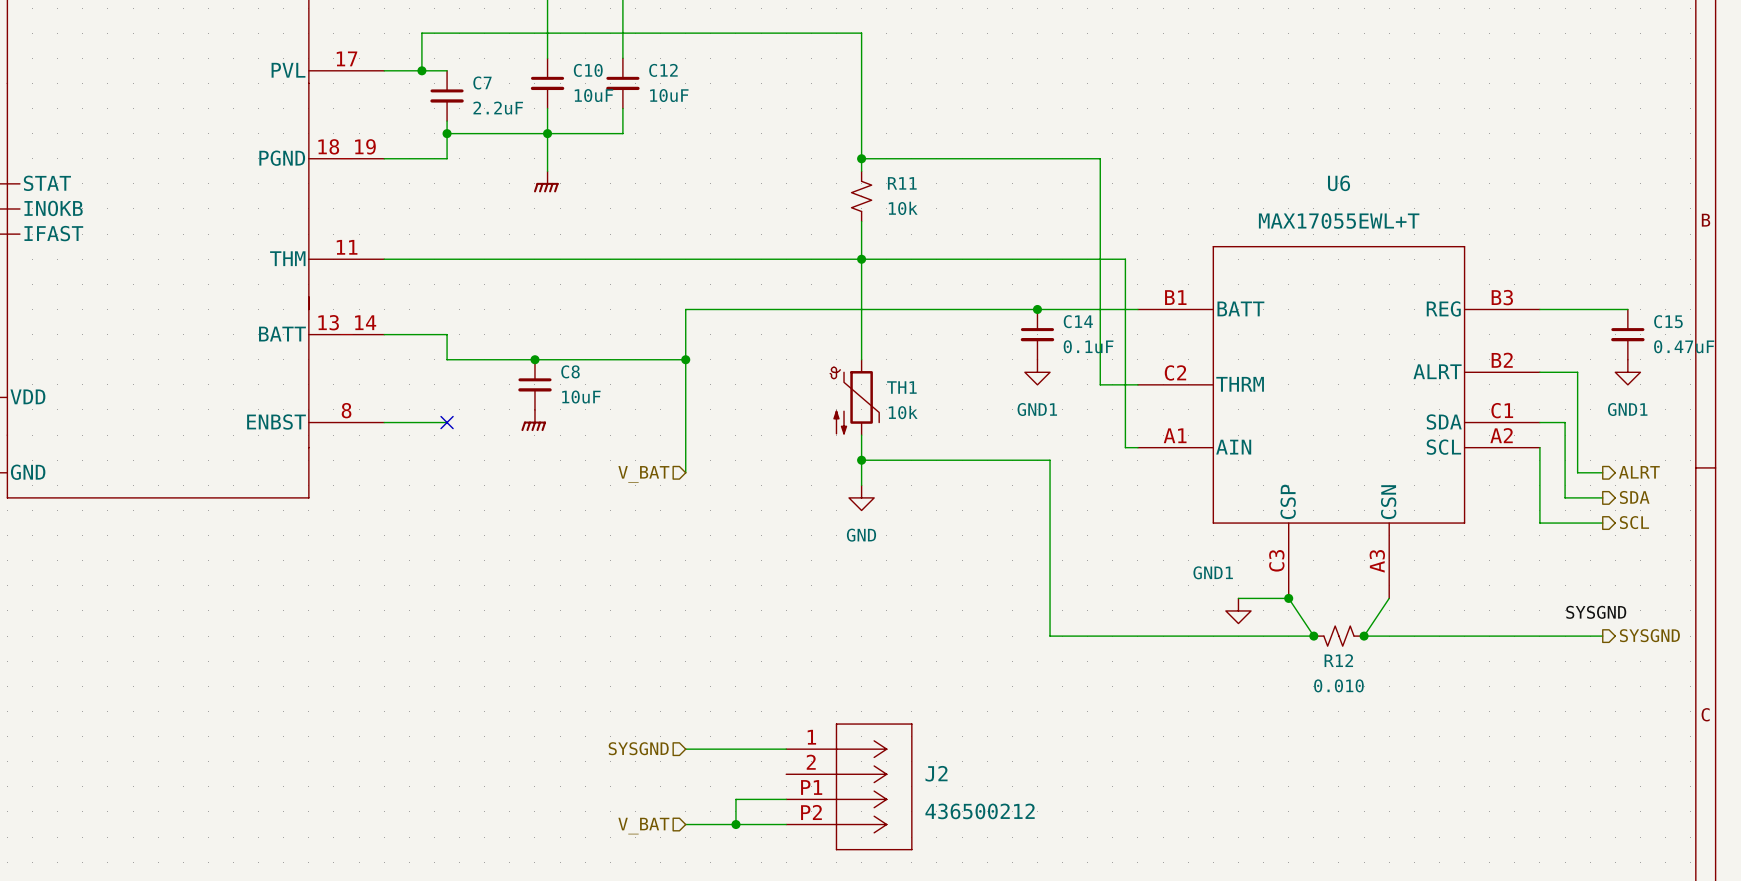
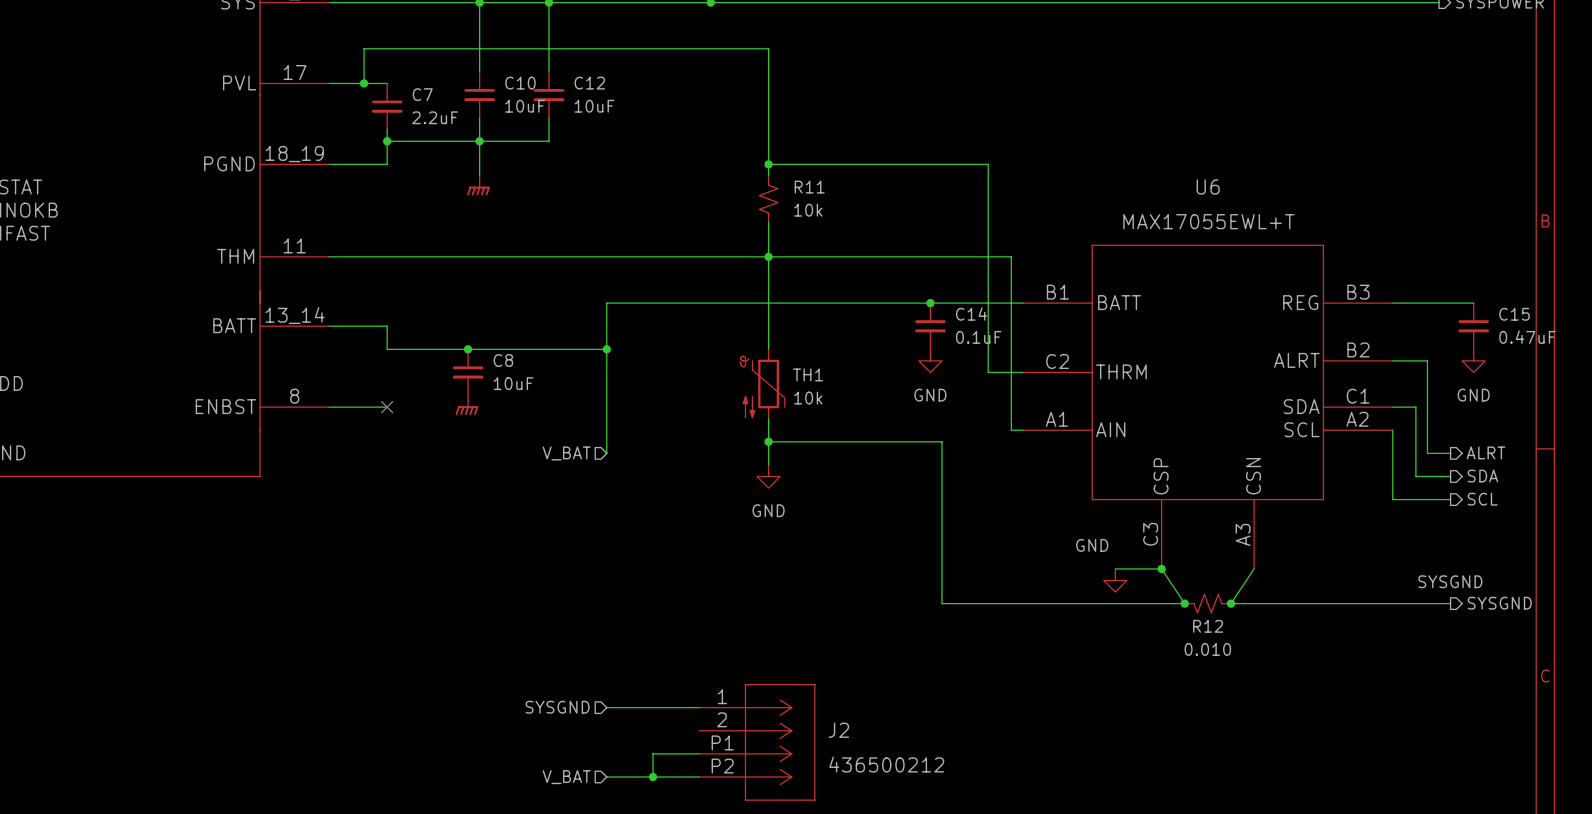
power symbol: GND1 (1037, 372) -> GND (930, 360)
power symbol: GND1 (1627, 372) -> GND (1473, 360)
power symbol: GND1 (1238, 610) -> GND (1115, 580)

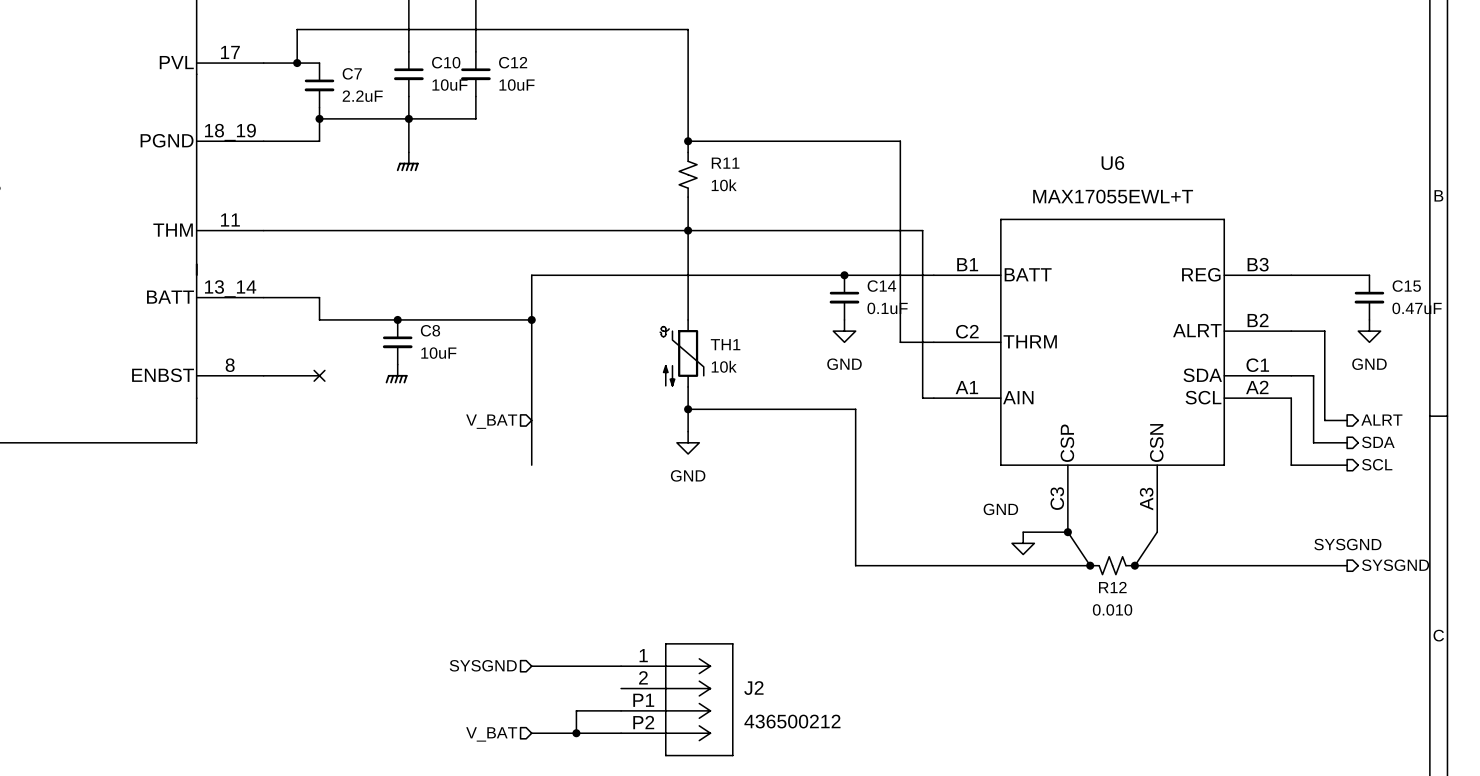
wire: none -> (531, 420) (531, 465)

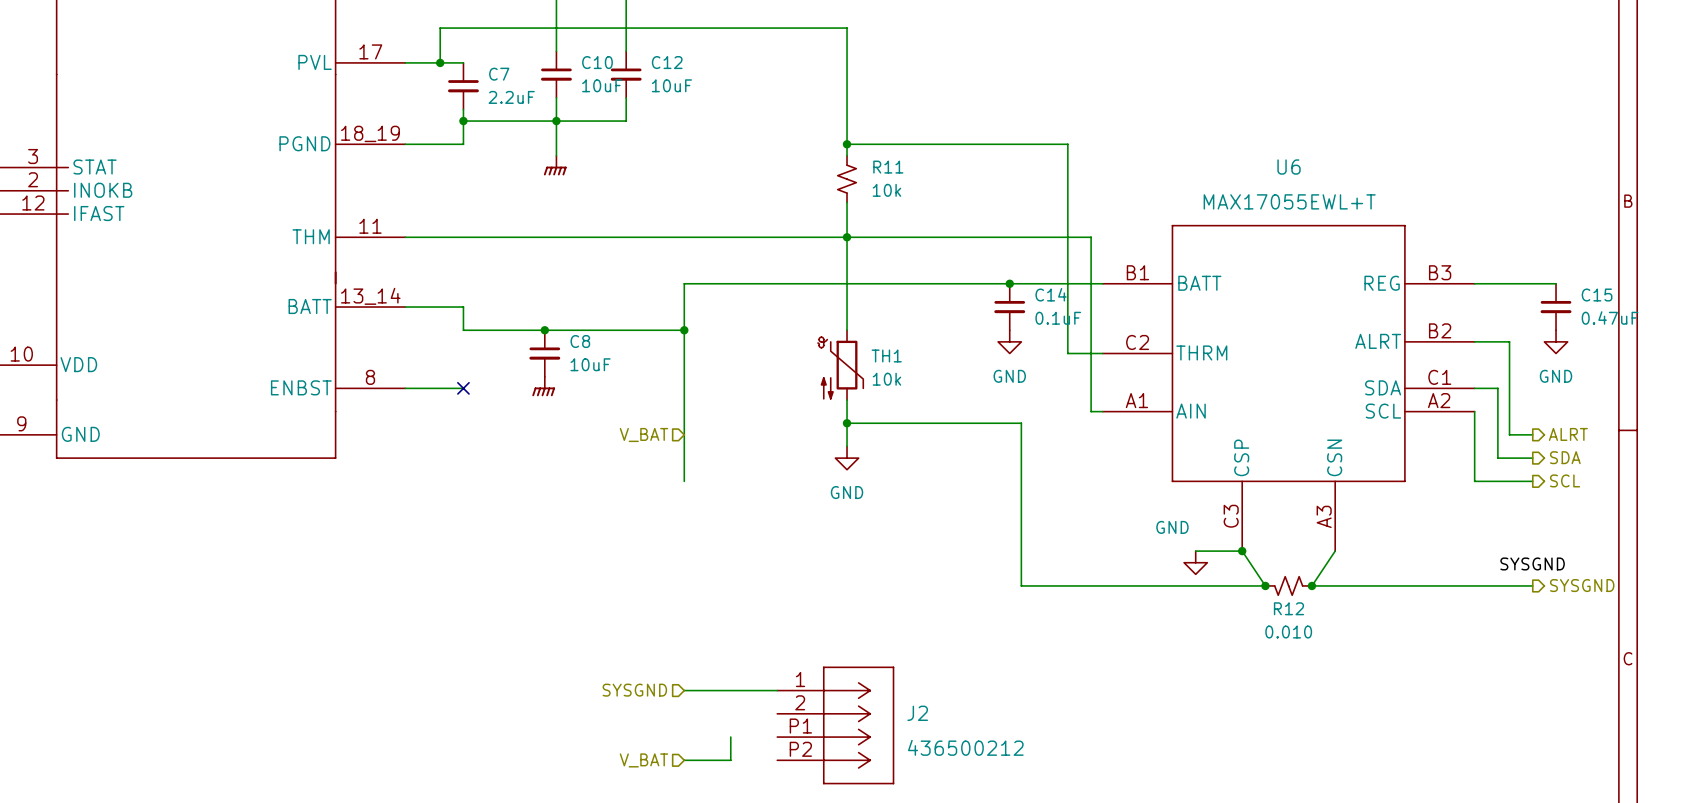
wire: (576, 710) (621, 710) -> none
wire: (576, 733) (621, 733) -> none
junction: (576, 733) -> none

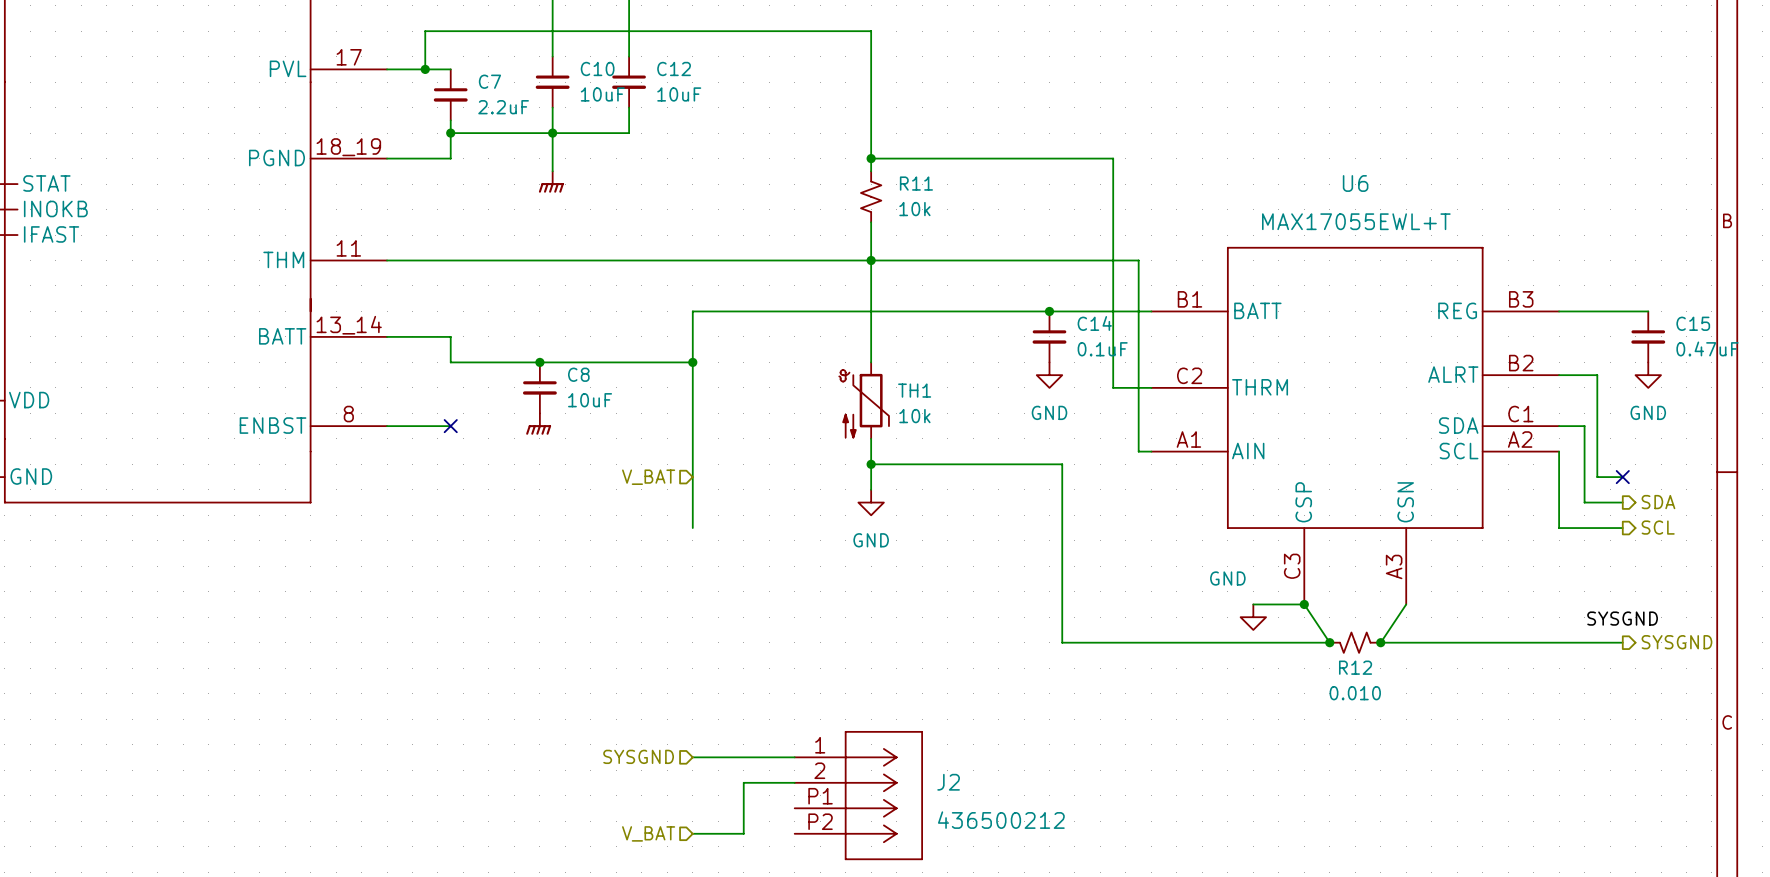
no-connect mark: none -> (1622, 477)
hierarchical label: ALRT (1568, 434) -> none
wire: none -> (794, 782) (743, 782) (743, 808)

